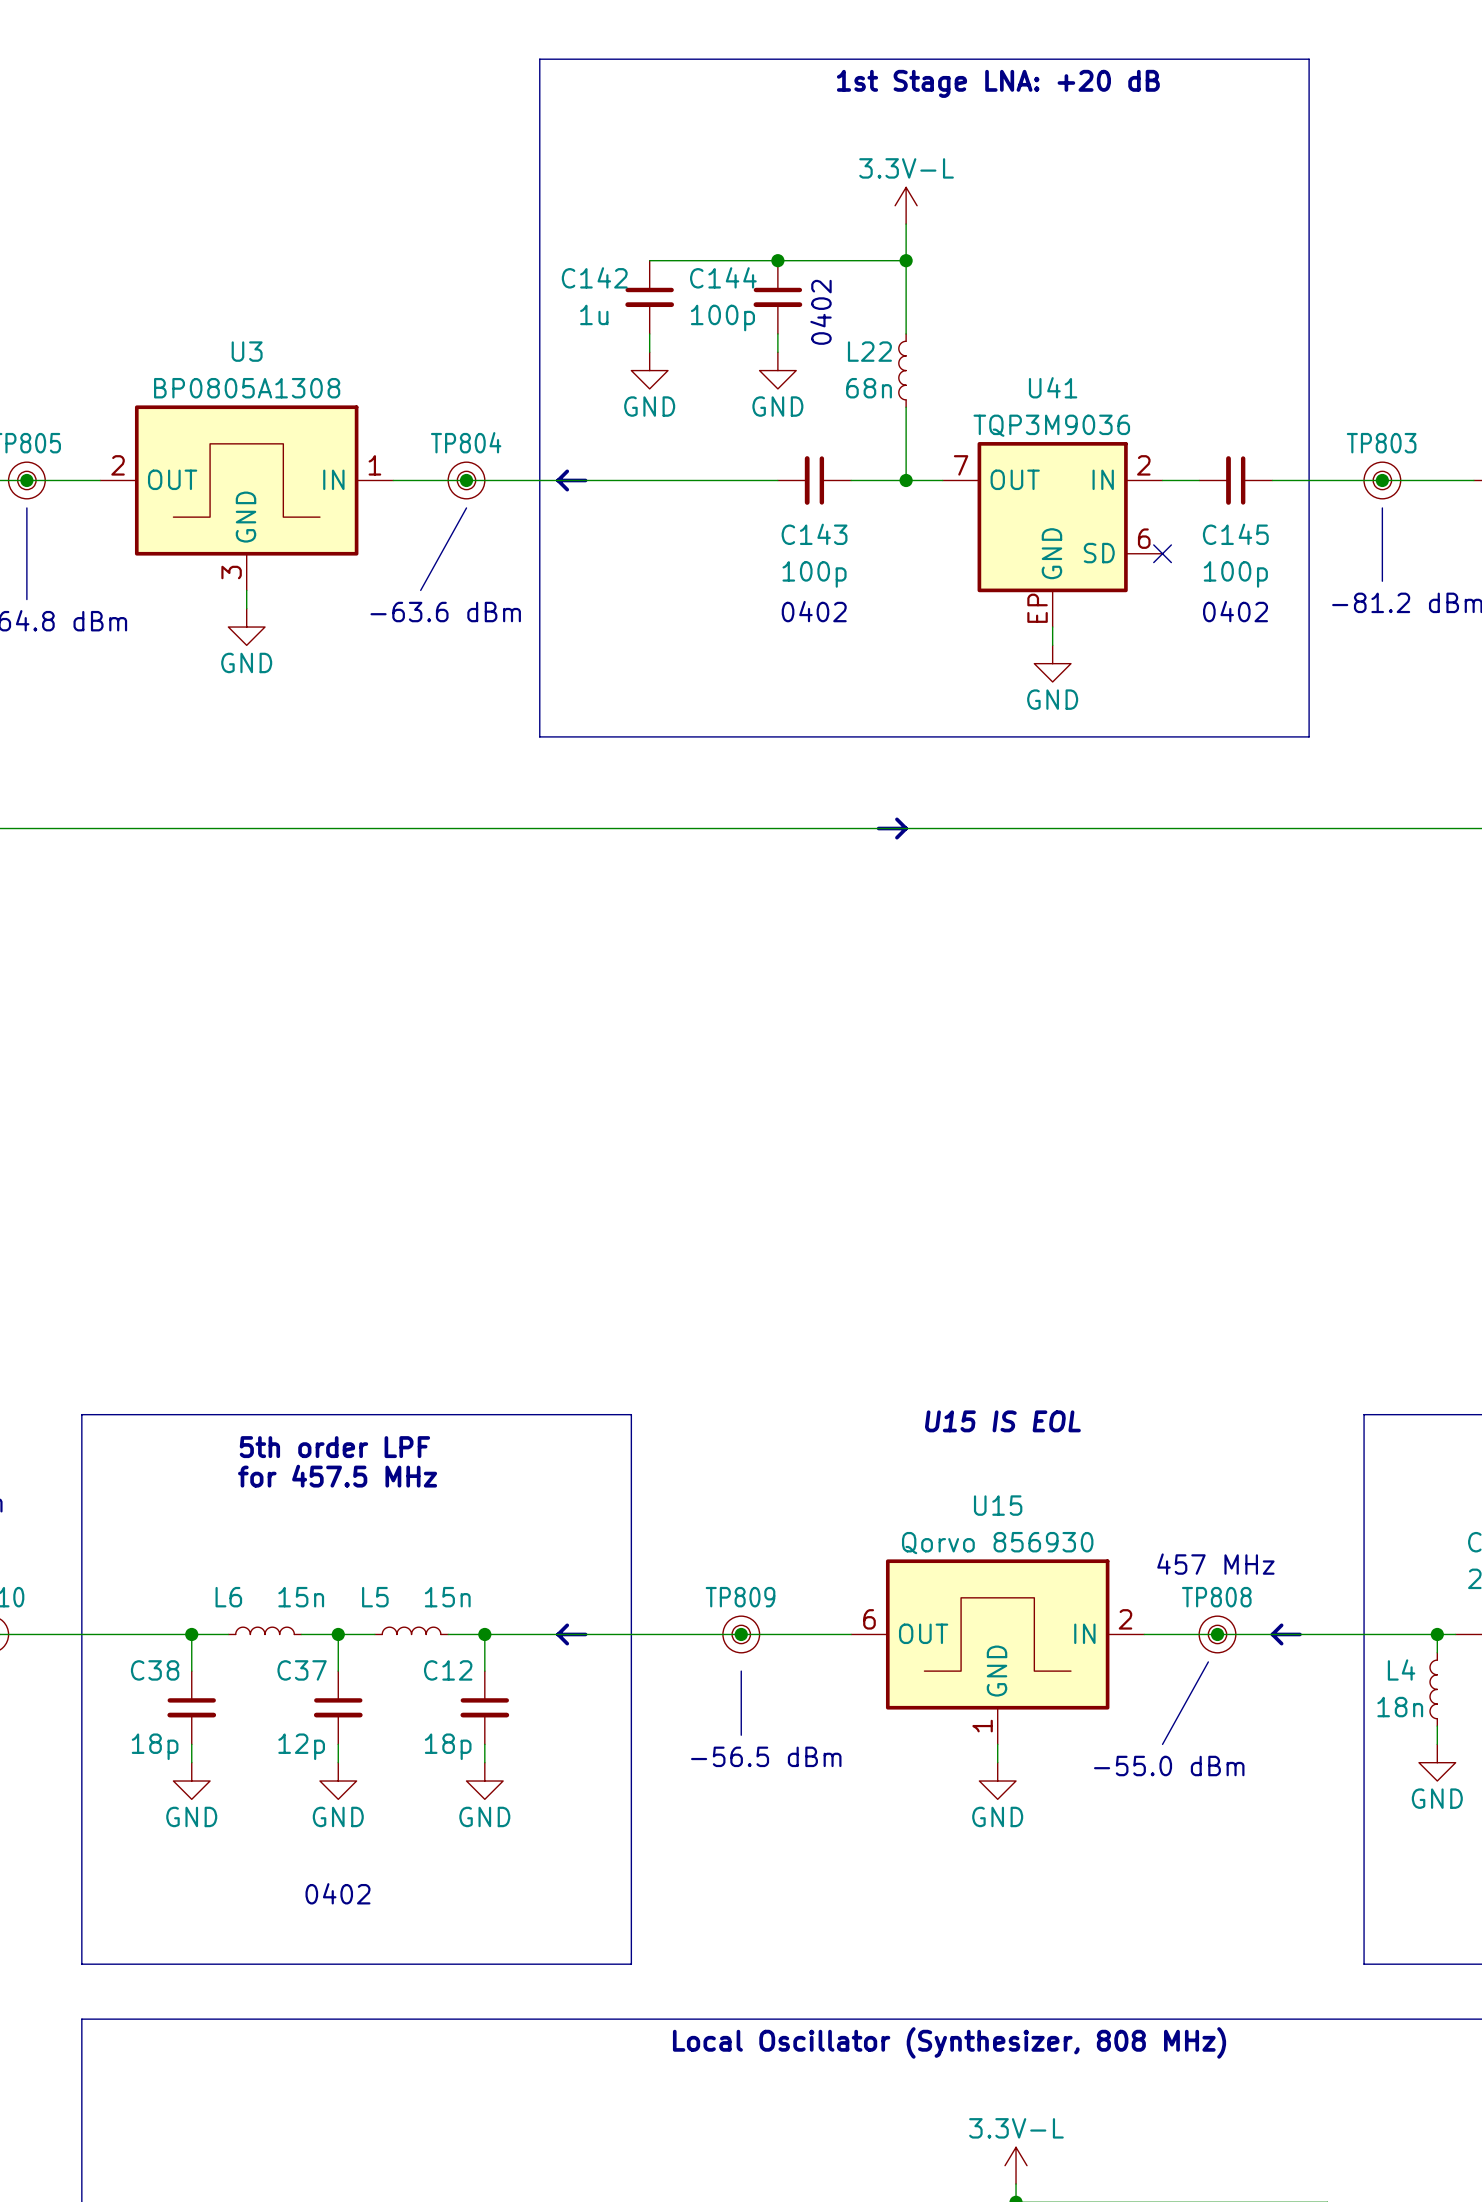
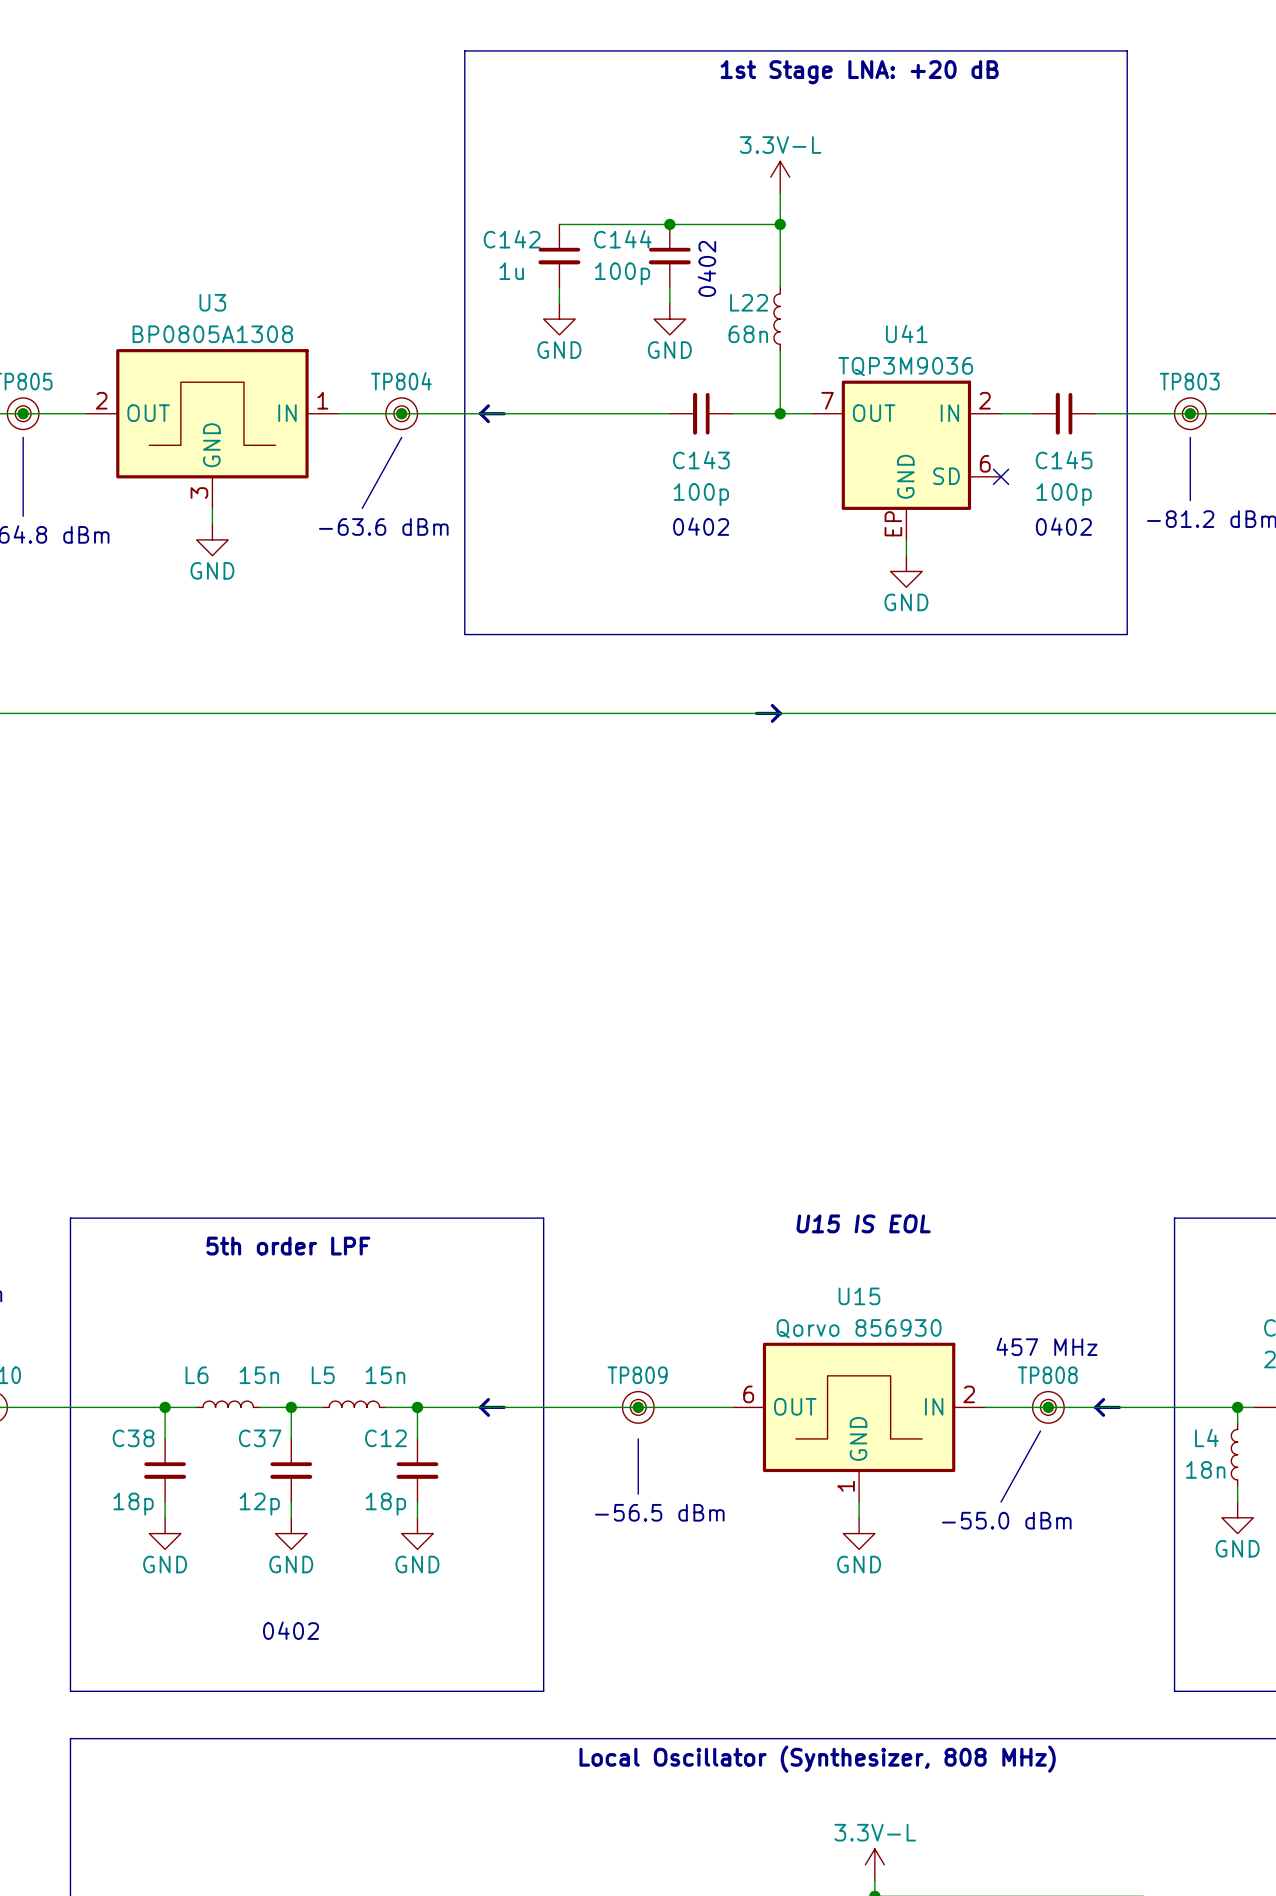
text: for 457.5 MHz (337, 1476) -> none

